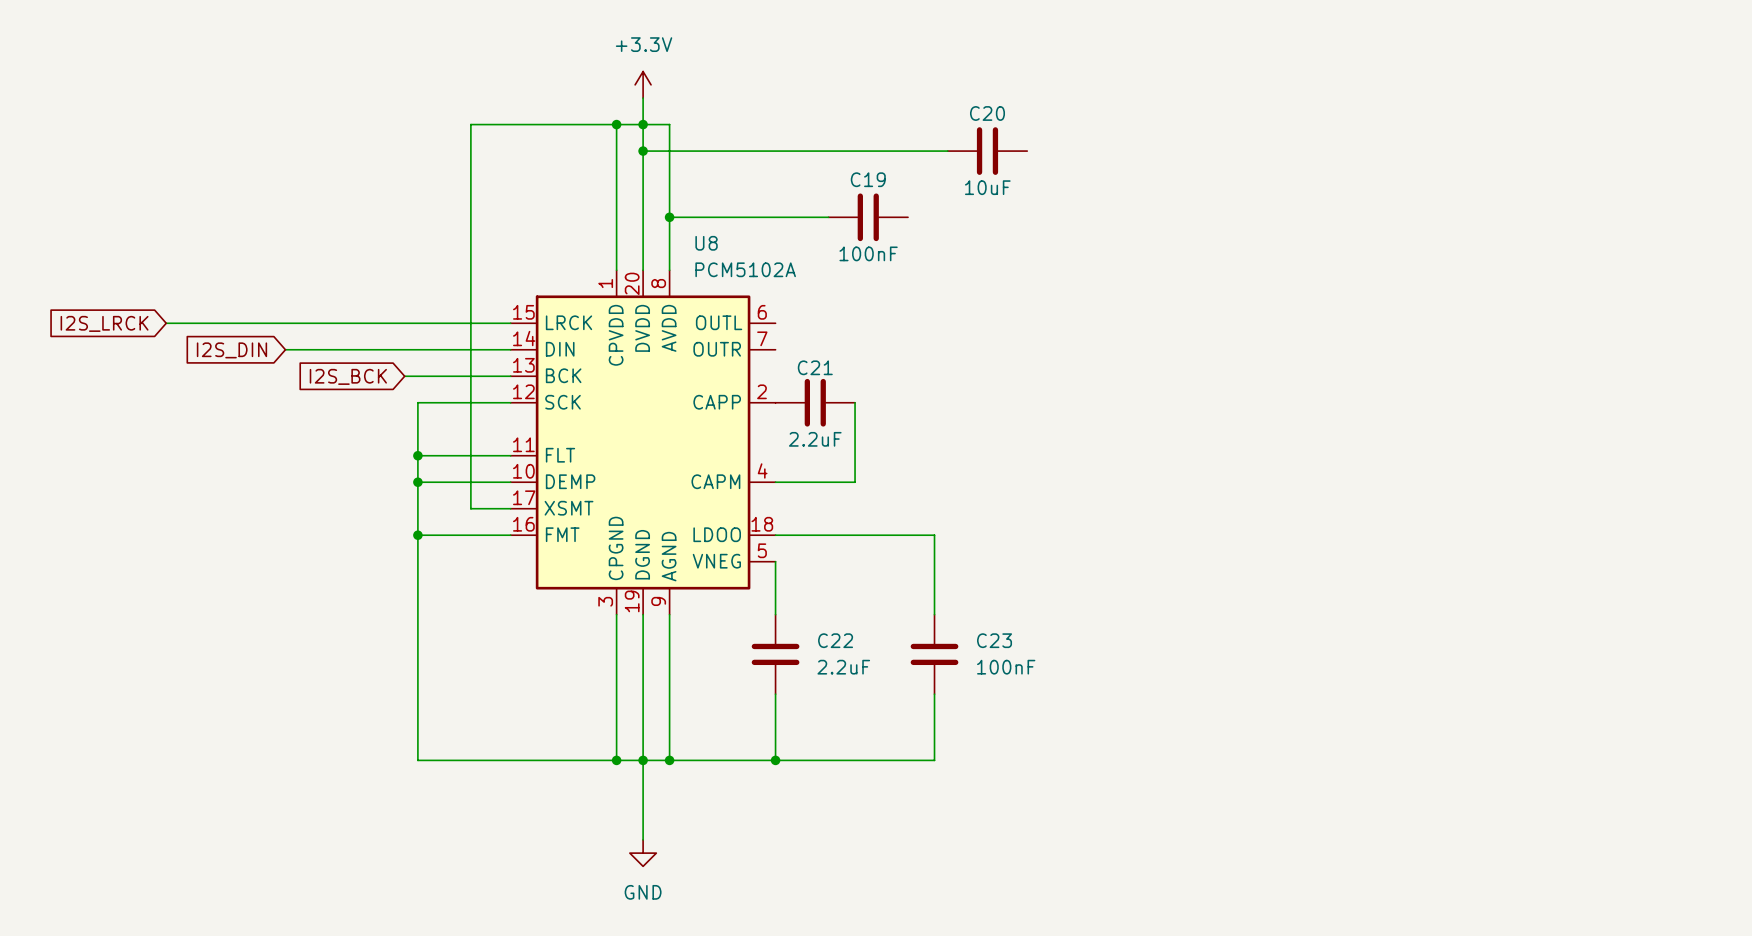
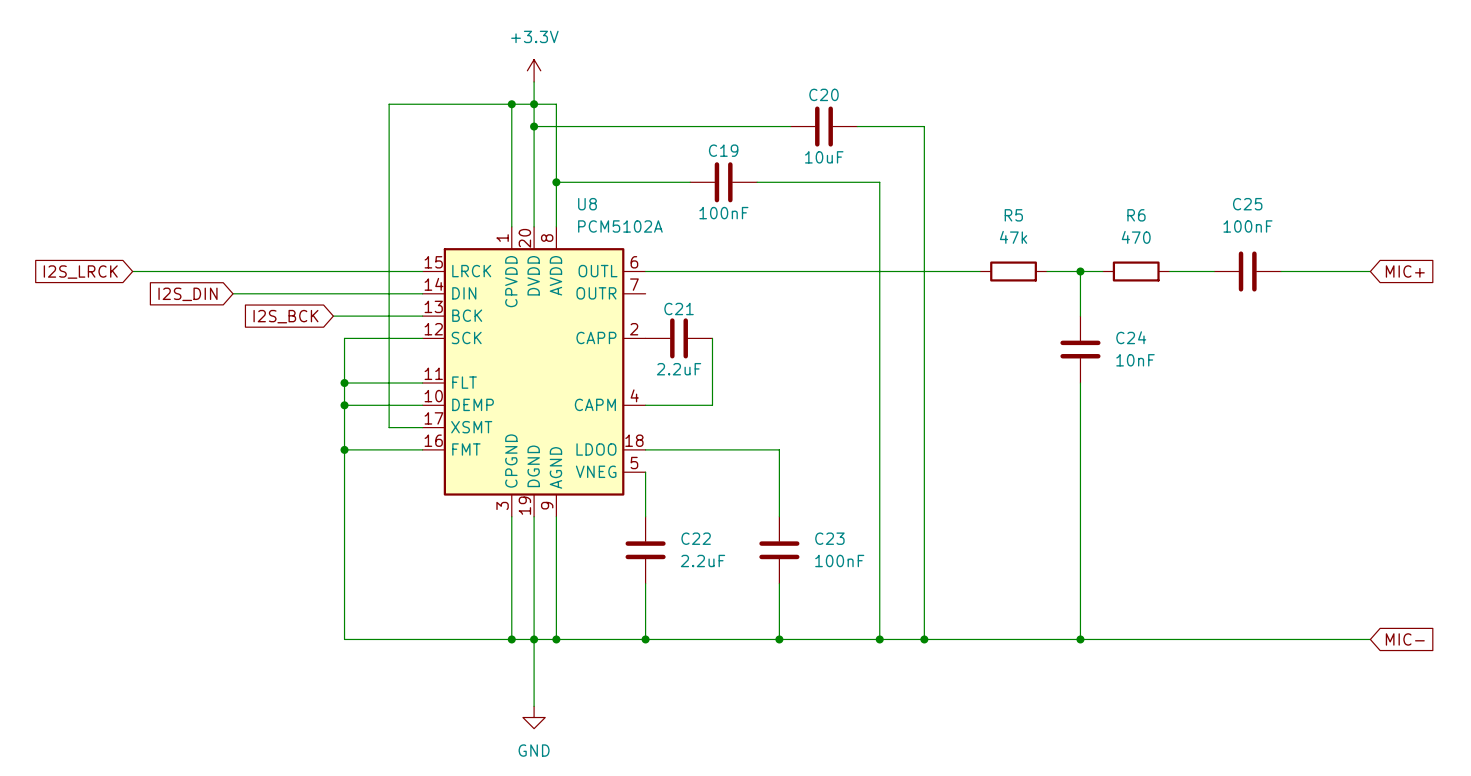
wire: none -> (857, 126) (924, 126) (924, 639)
wire: none -> (757, 182) (879, 182) (879, 639)
wire: none -> (645, 271) (980, 271)
R5: none -> 47k (1013, 271)
wire: none -> (1047, 271) (1102, 271)
wire: none -> (1080, 271) (1080, 316)
junction: none -> (1080, 271)
R6: none -> 470 (1136, 271)
wire: none -> (1169, 271) (1214, 271)
C25: none -> 100nF (1247, 271)
wire: none -> (1281, 271) (1370, 271)
global label: none -> MIC+ (1405, 271)
C24: none -> 10nF (1080, 349)
wire: none -> (1080, 383) (1080, 639)
wire: none -> (779, 639) (1370, 639)
junction: none -> (779, 639)
junction: none -> (879, 639)
junction: none -> (924, 639)
junction: none -> (1080, 639)
global label: none -> MIC- (1405, 639)

